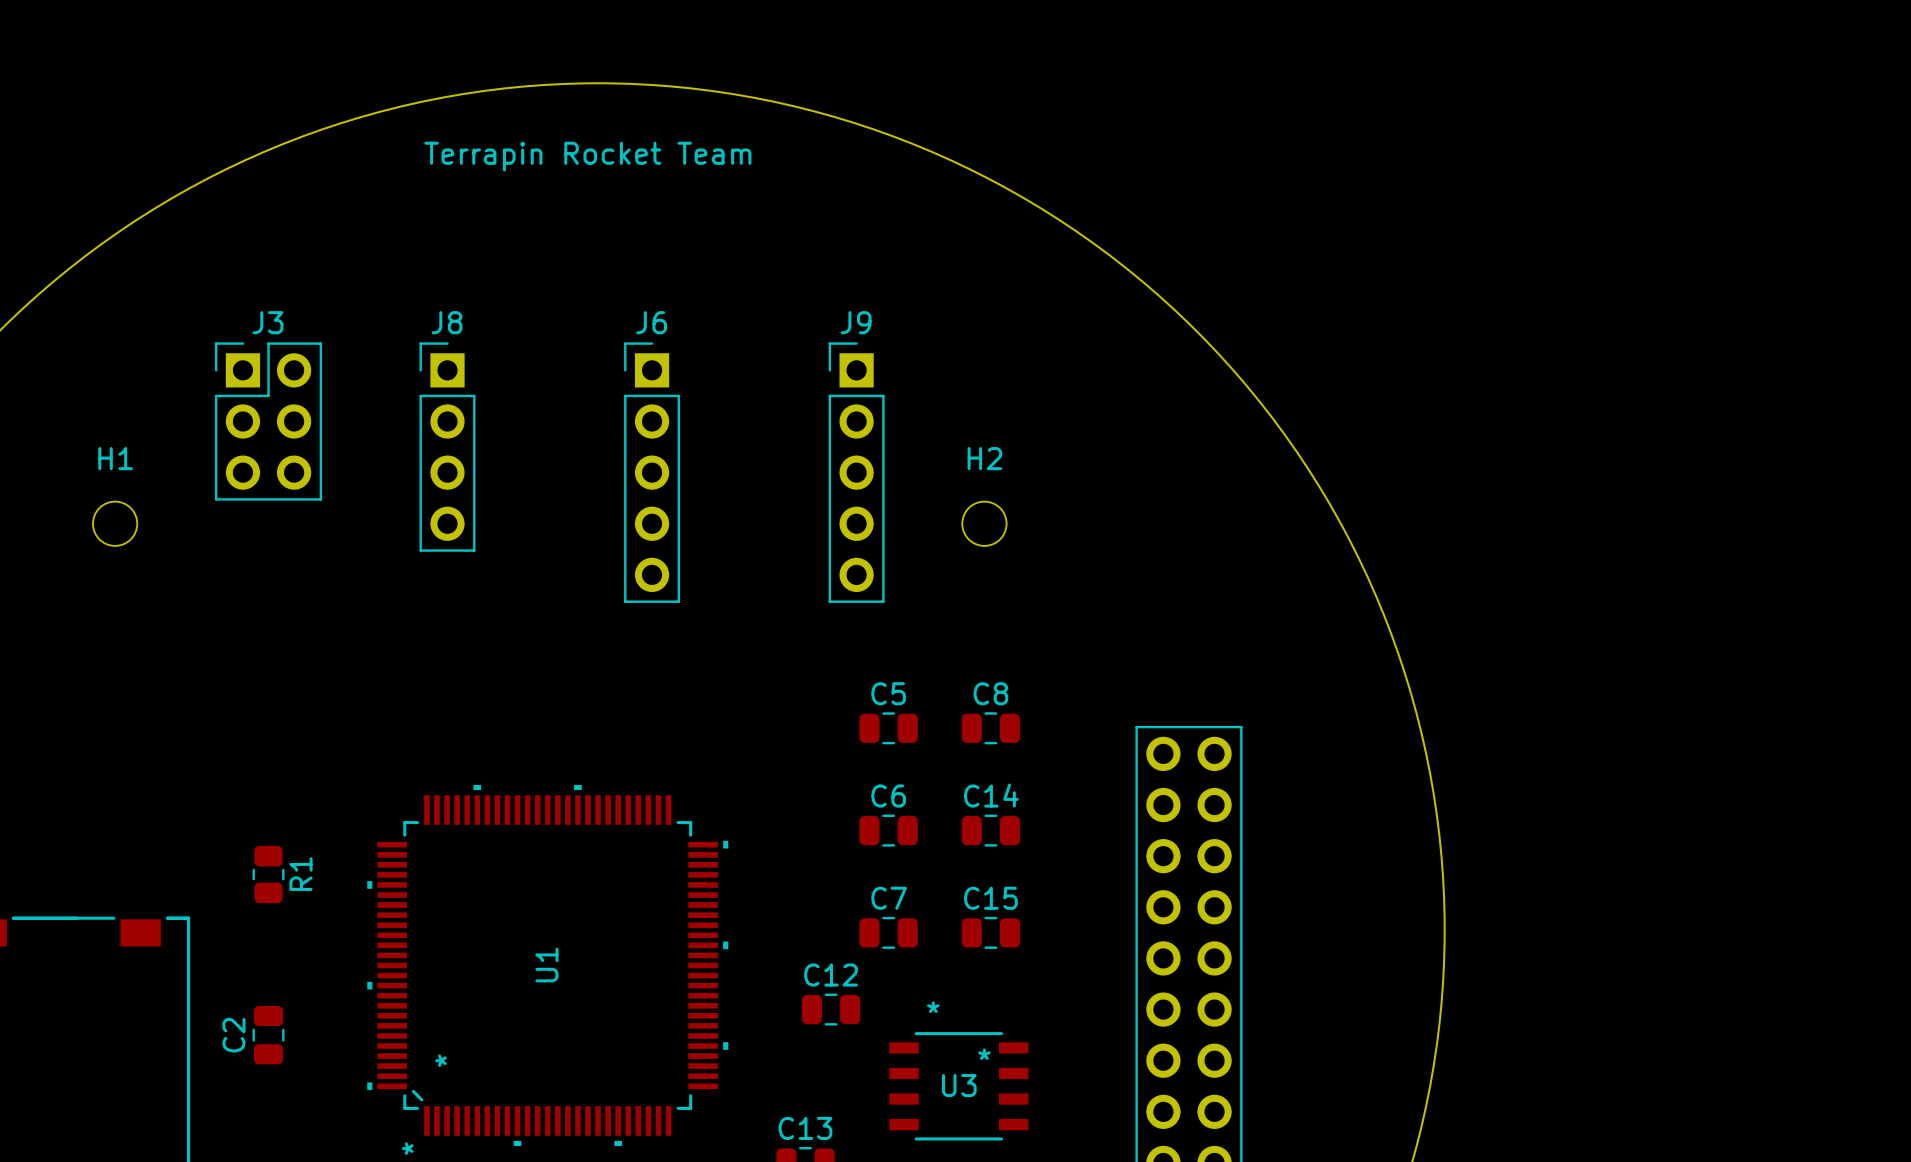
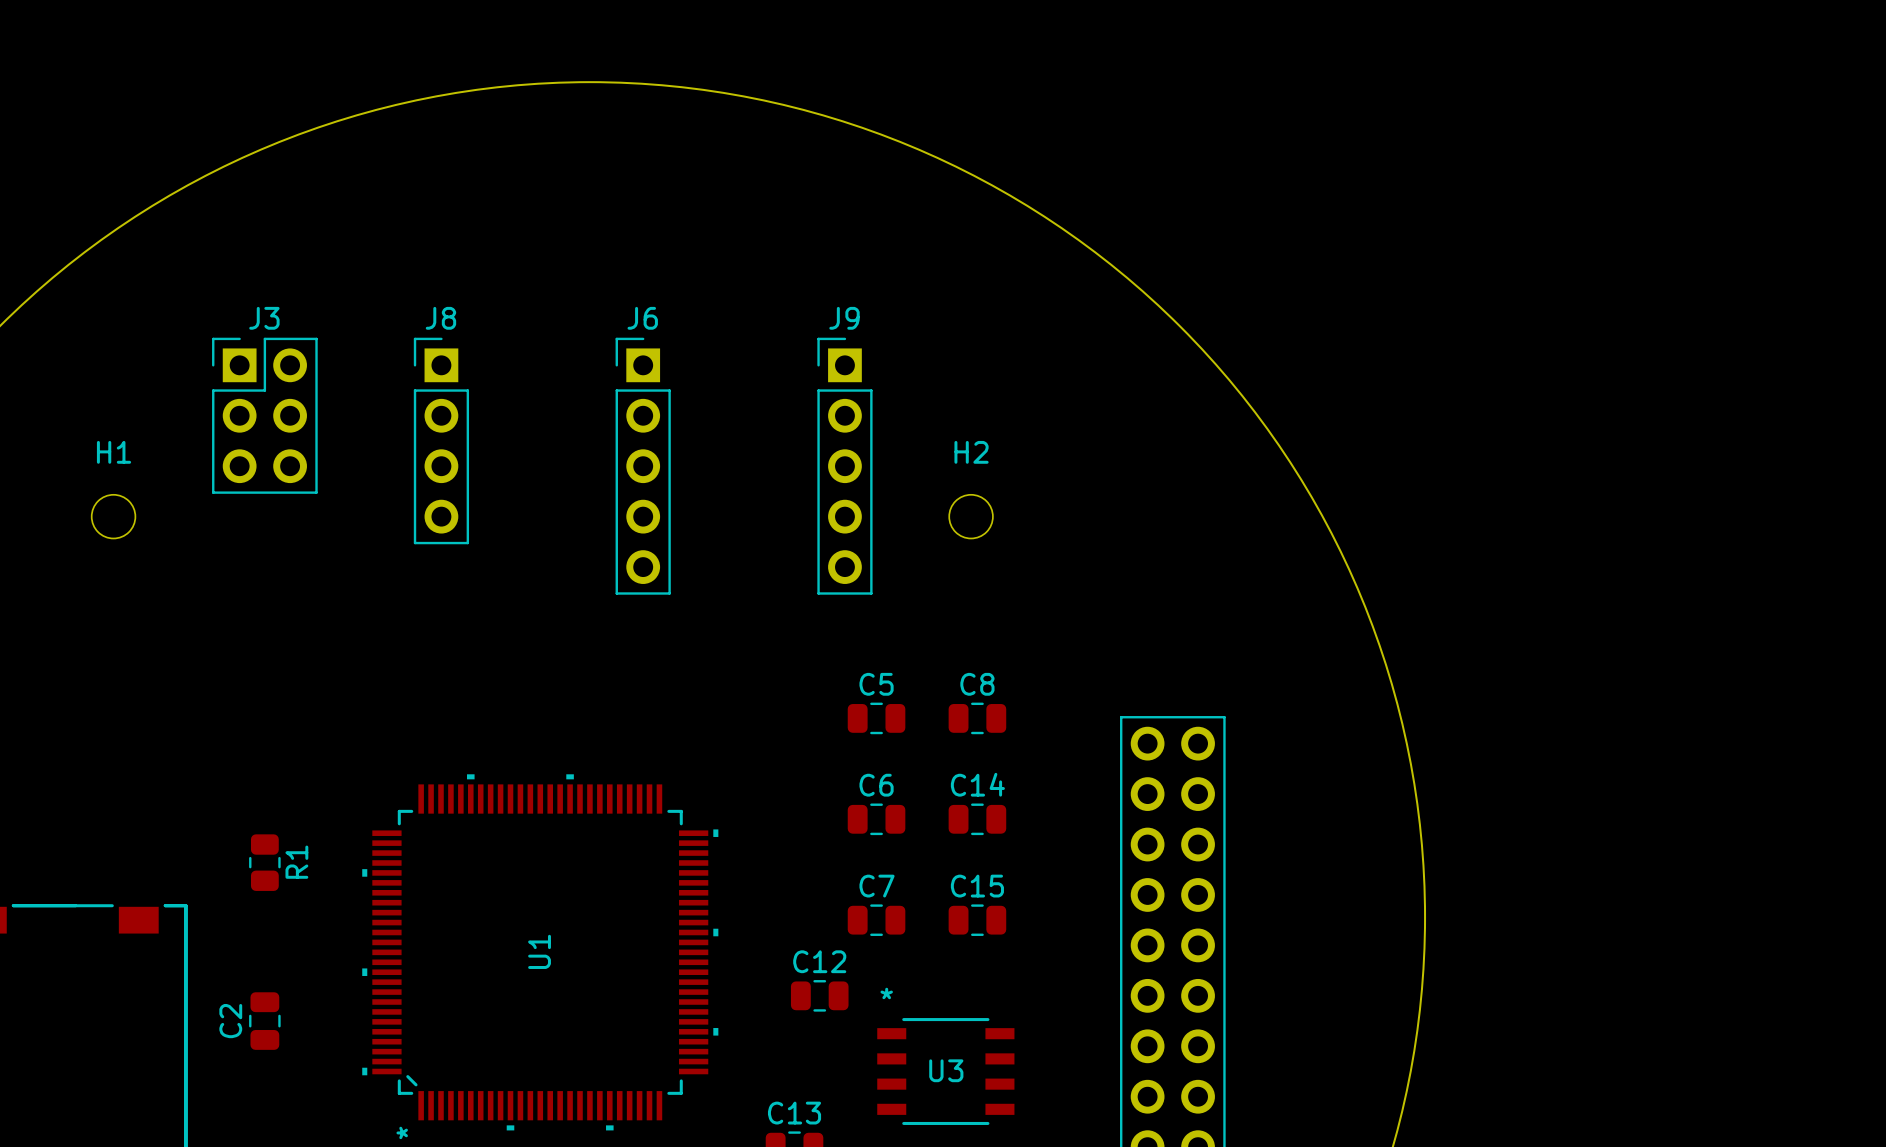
text: Terrapin Rocket Team (587, 156) -> none
U3 text position: * (933, 1007) -> * (886, 993)
U3 text: * (984, 1054) -> none
U1 text: * (441, 1060) -> none

